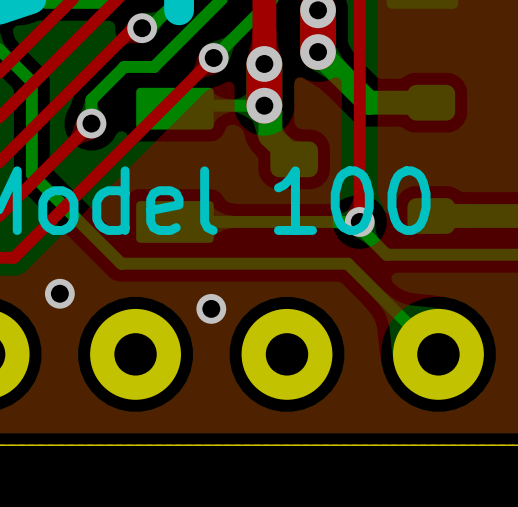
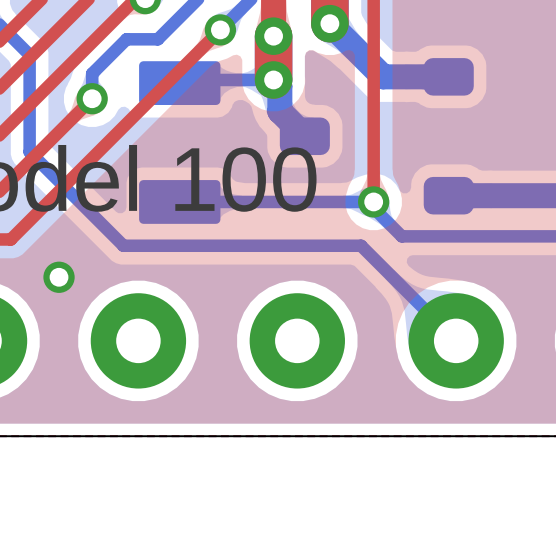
via: (211, 308) -> none

